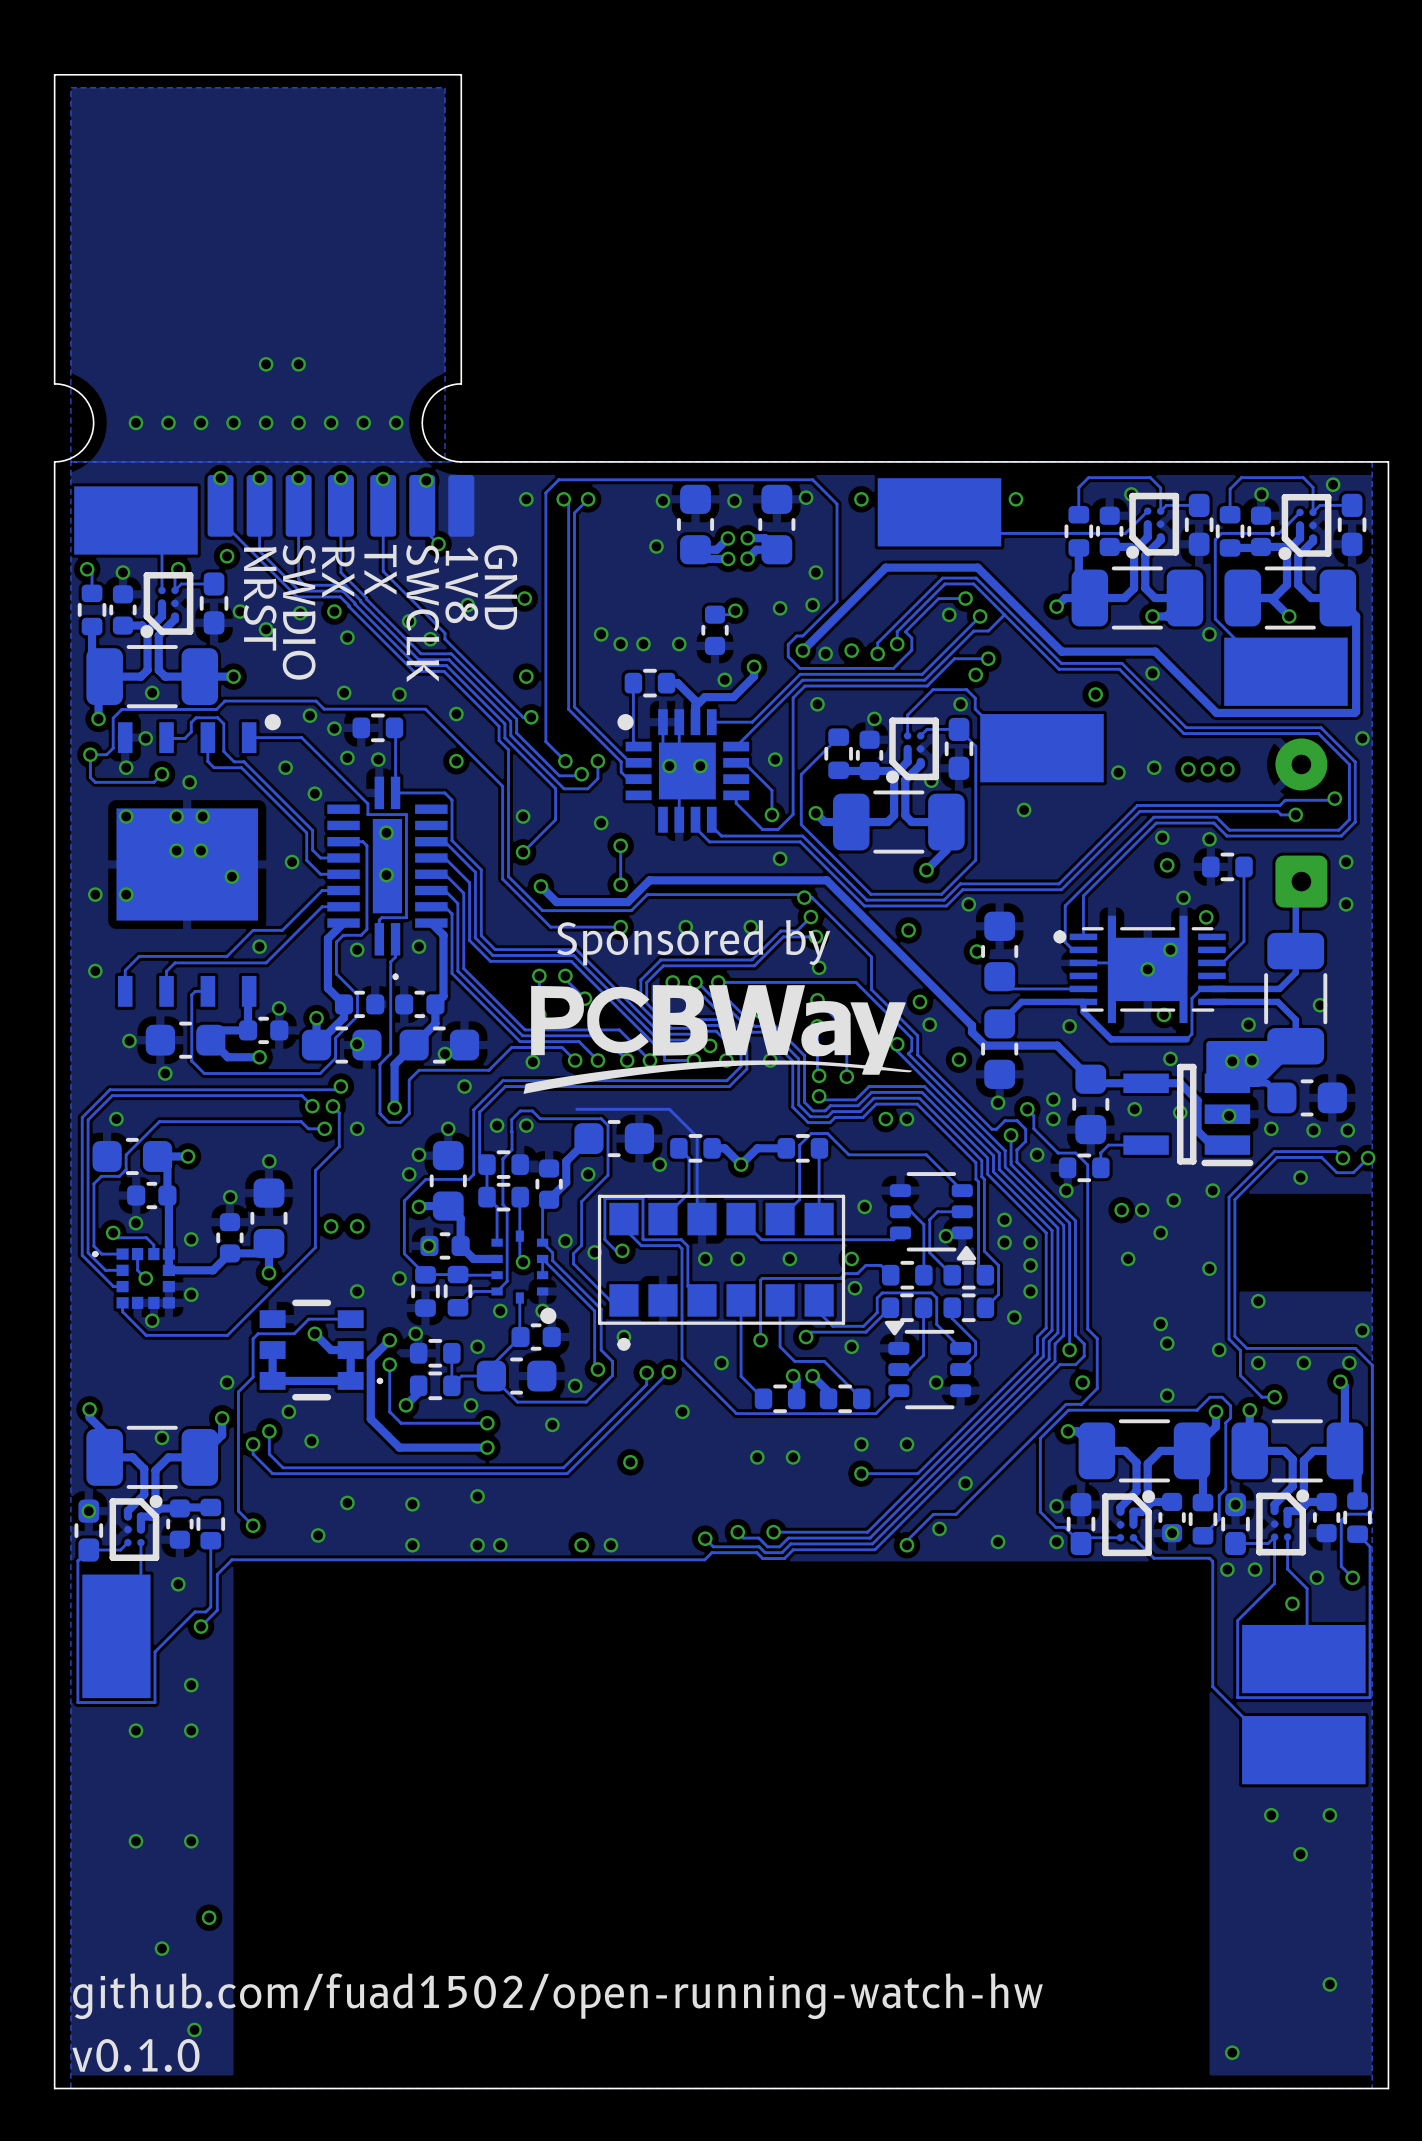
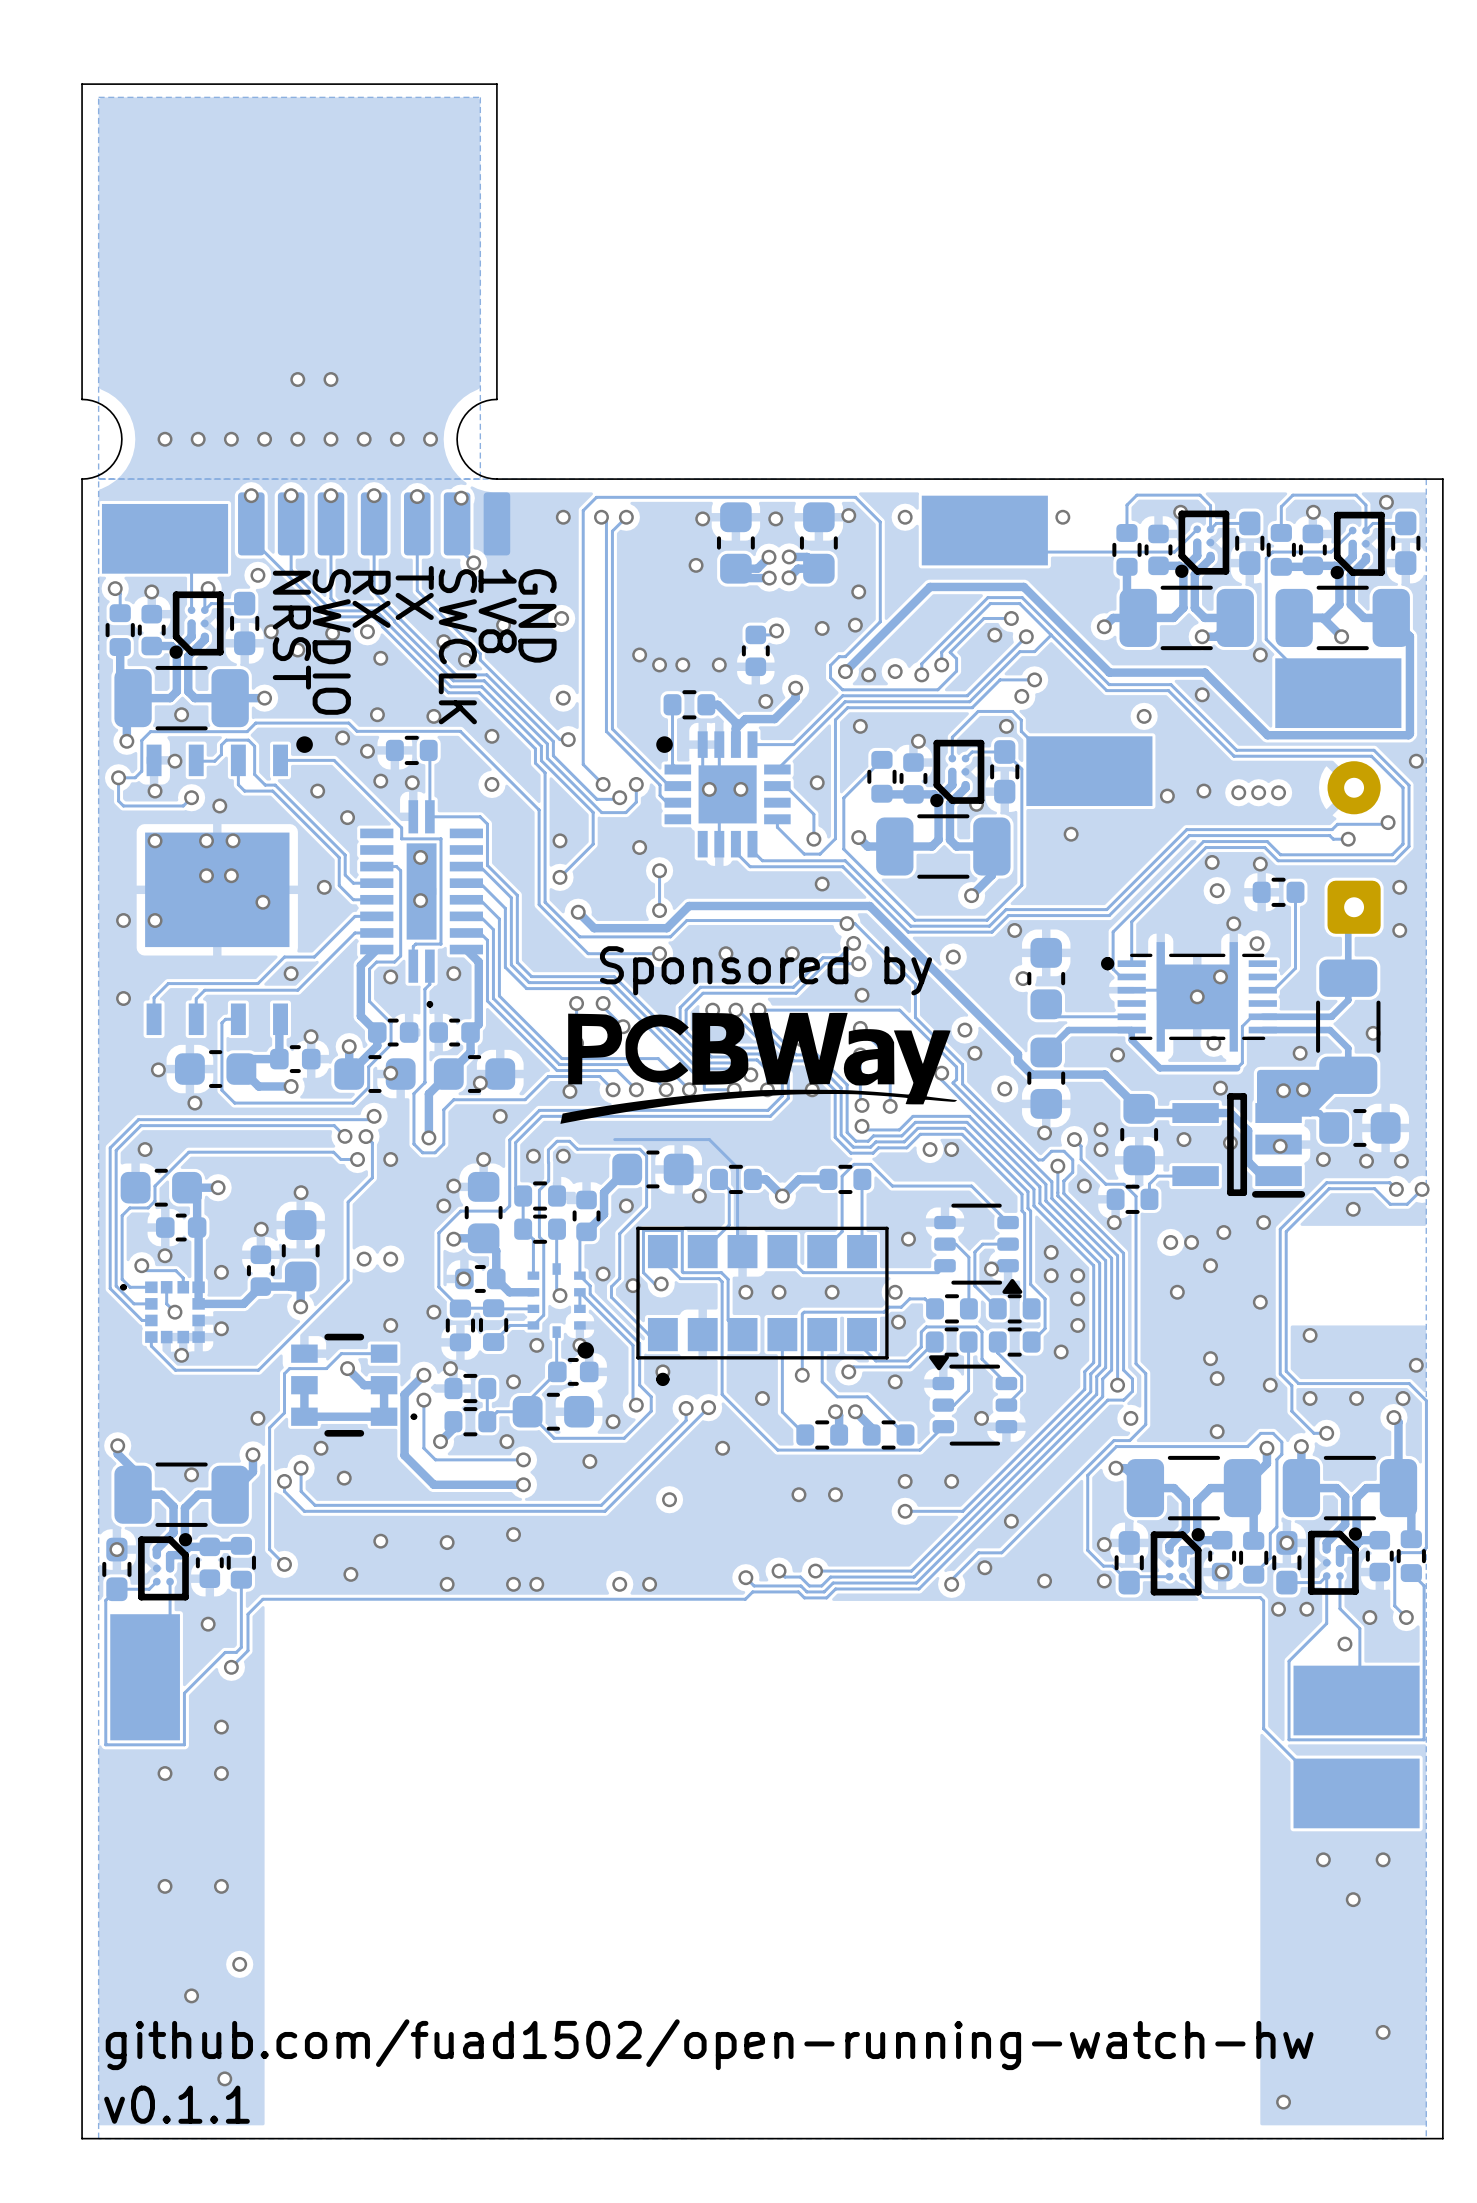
text: v0.1.0 (135, 2055) -> v0.1.1 (176, 2104)

